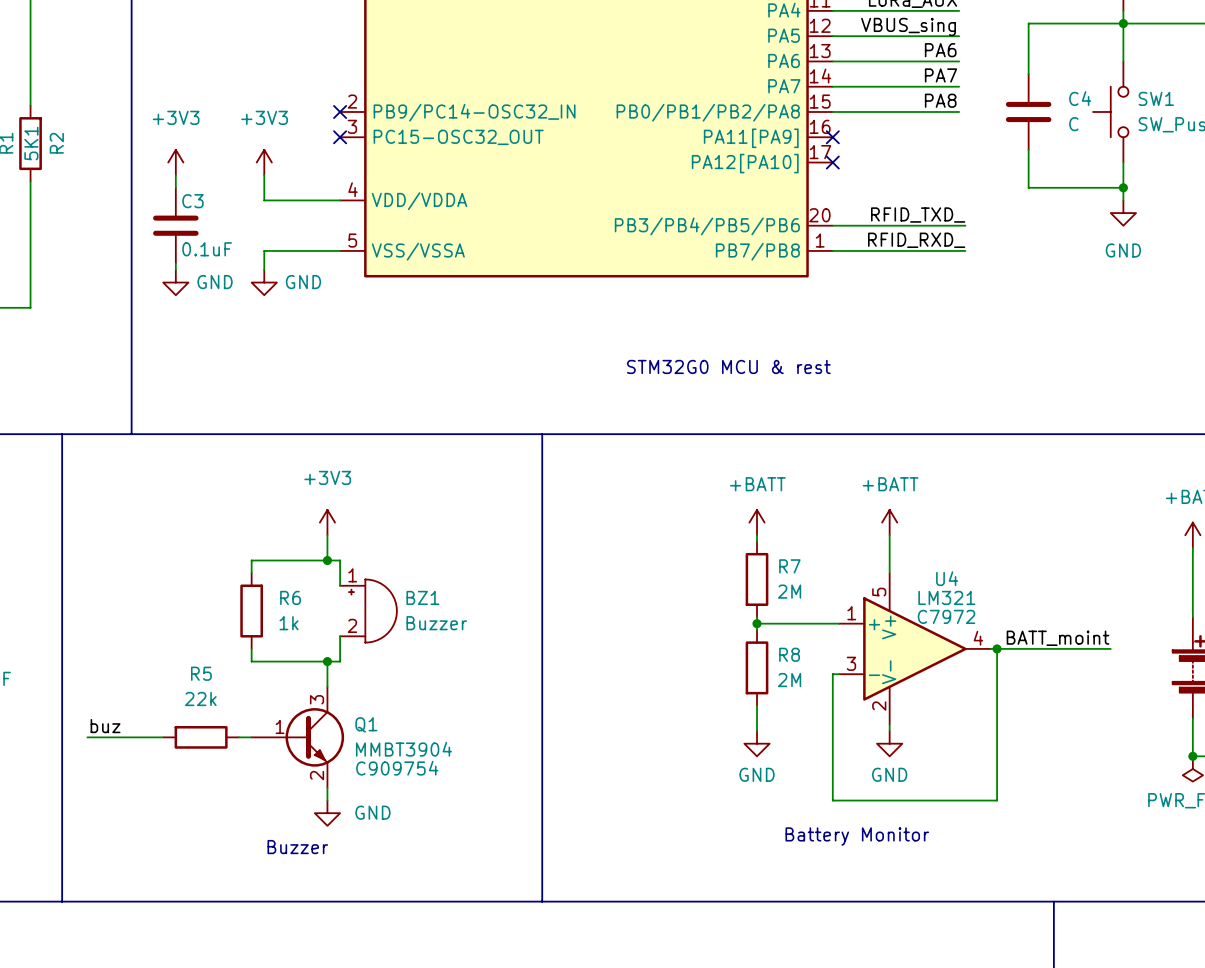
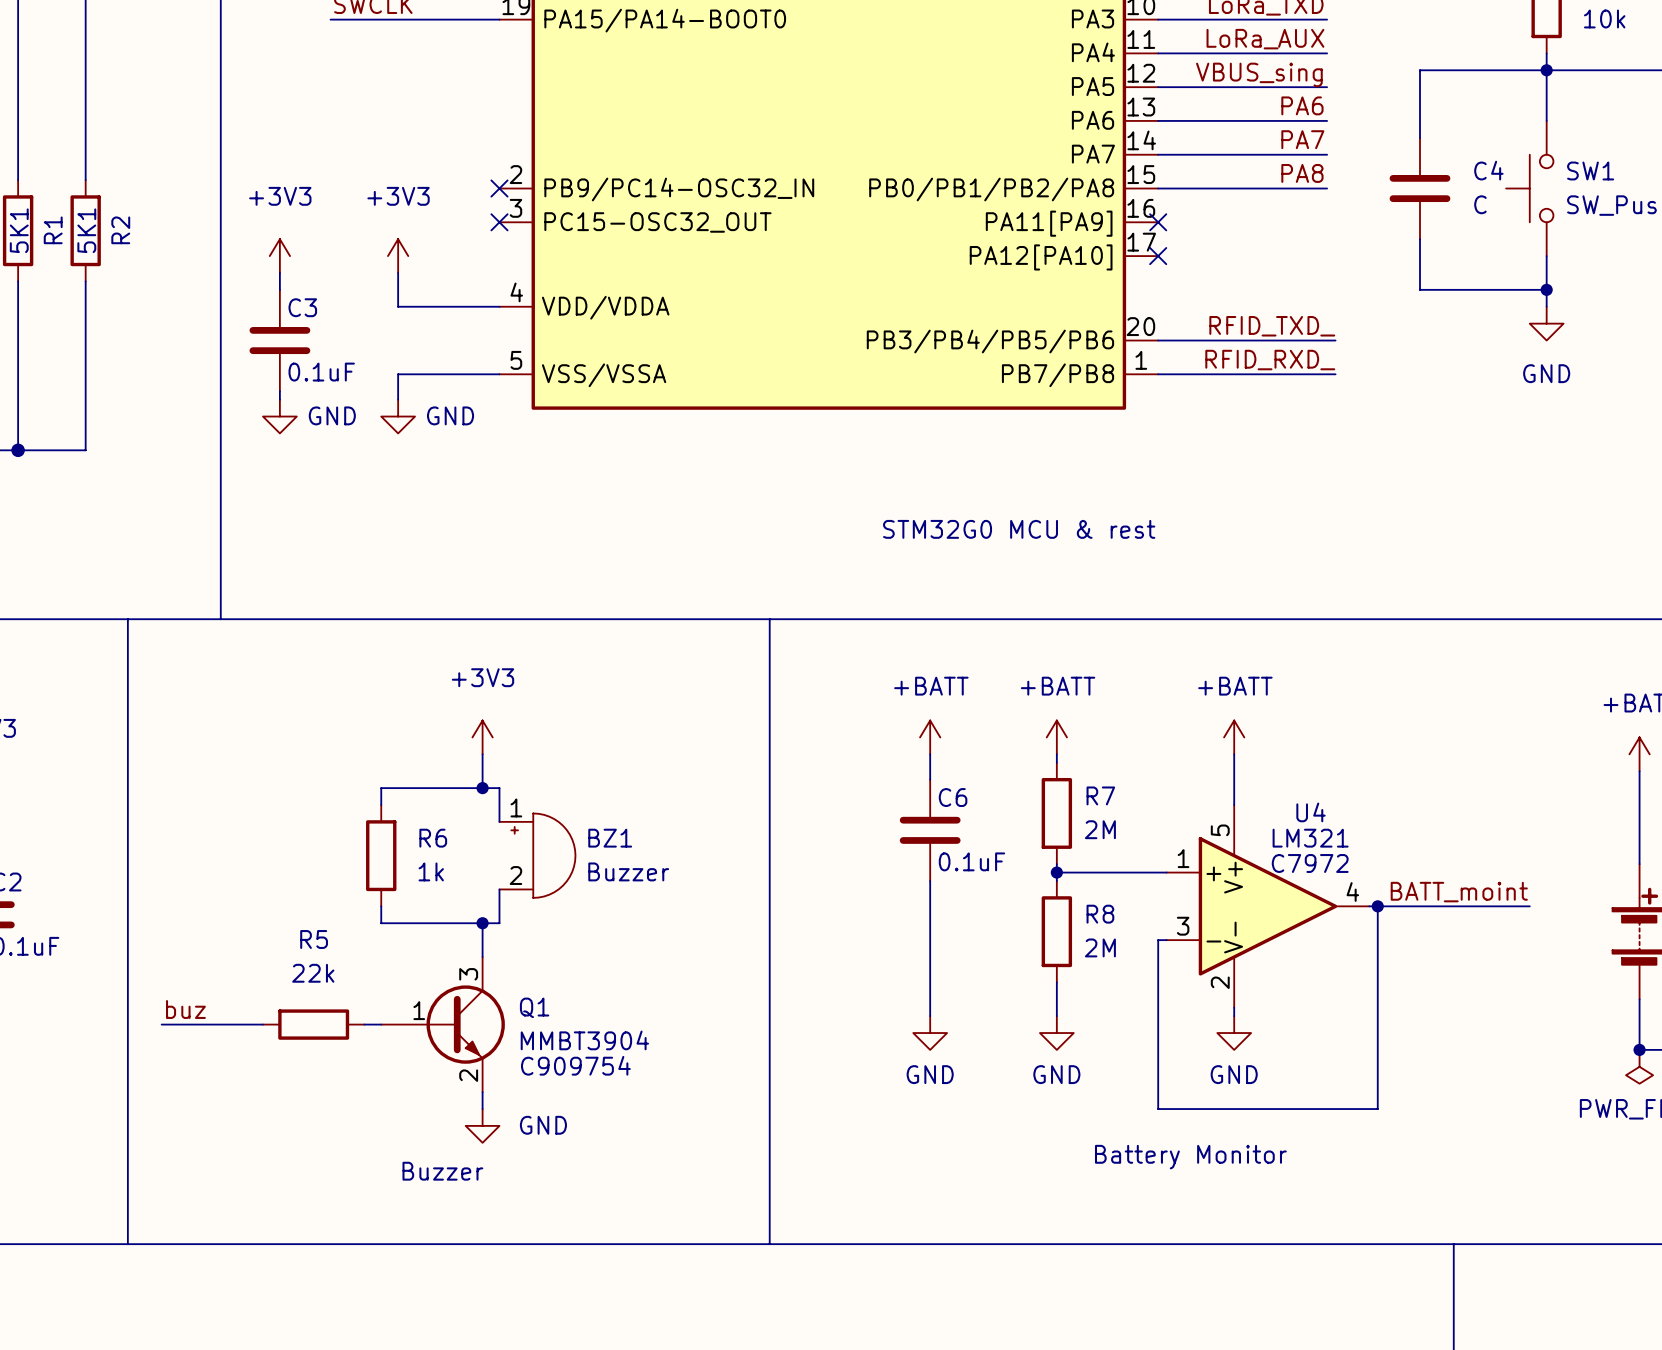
power symbol: none -> +BATT (930, 737)
wire: none -> (930, 754) (930, 779)
C6: none -> 0.1uF (930, 830)
wire: none -> (930, 881) (930, 1016)
power symbol: none -> GND (930, 1033)

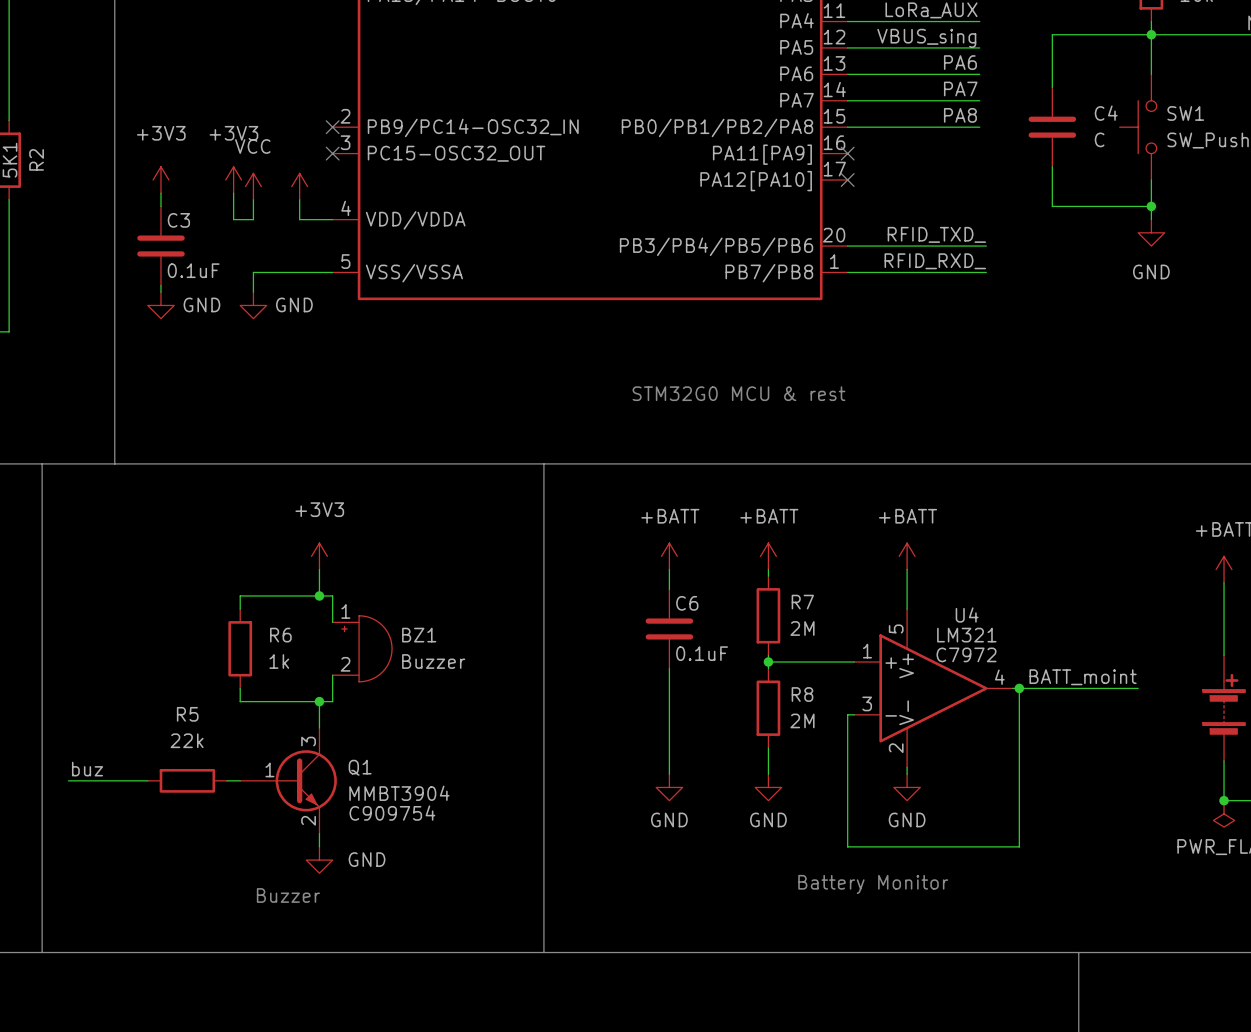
power symbol: none -> +3V3 (233, 180)
power symbol: +3V3 (398, 256) -> VCC (253, 186)
power symbol: none -> (299, 186)
wire: none -> (233, 193) (233, 219) (253, 219)
wire: (398, 306) (457, 306) -> (299, 199) (299, 219)

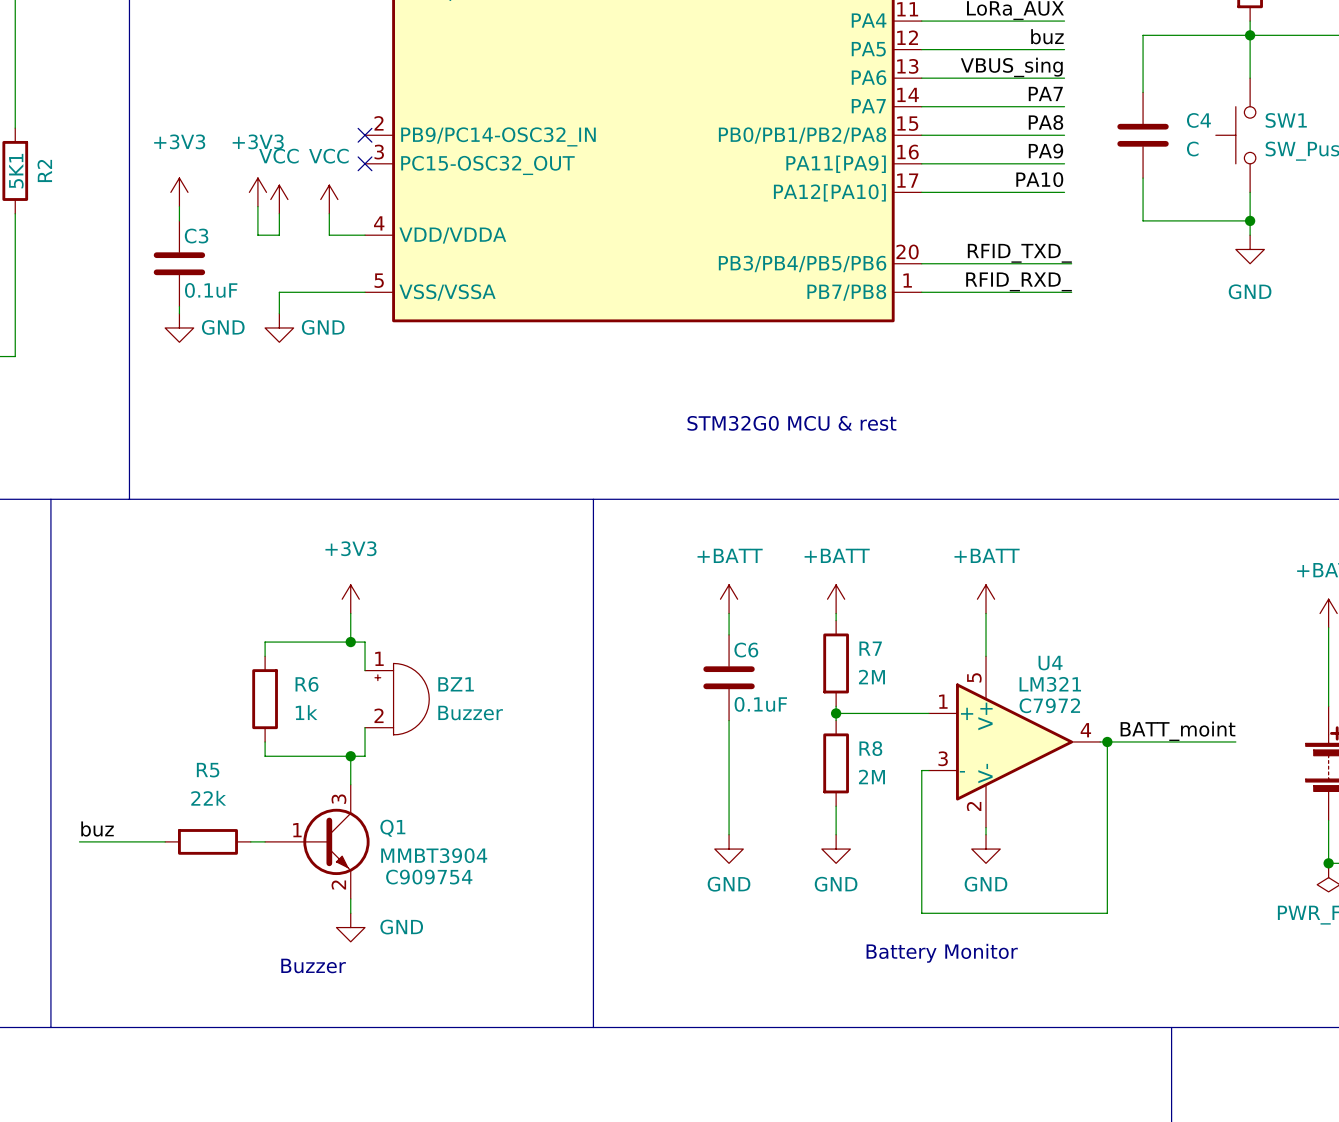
label: VBUS_sing (926, 38) -> buz (1047, 36)
label: PA6 (960, 62) -> VBUS_sing (1011, 67)
label: none -> PA9 (1045, 151)
power symbol text: none -> VCC (328, 156)
wire: none -> (921, 163) (1064, 163)
no-connect mark: (847, 153) -> none
label: none -> PA10 (1039, 179)
wire: none -> (921, 192) (1064, 192)
no-connect mark: (847, 180) -> none

